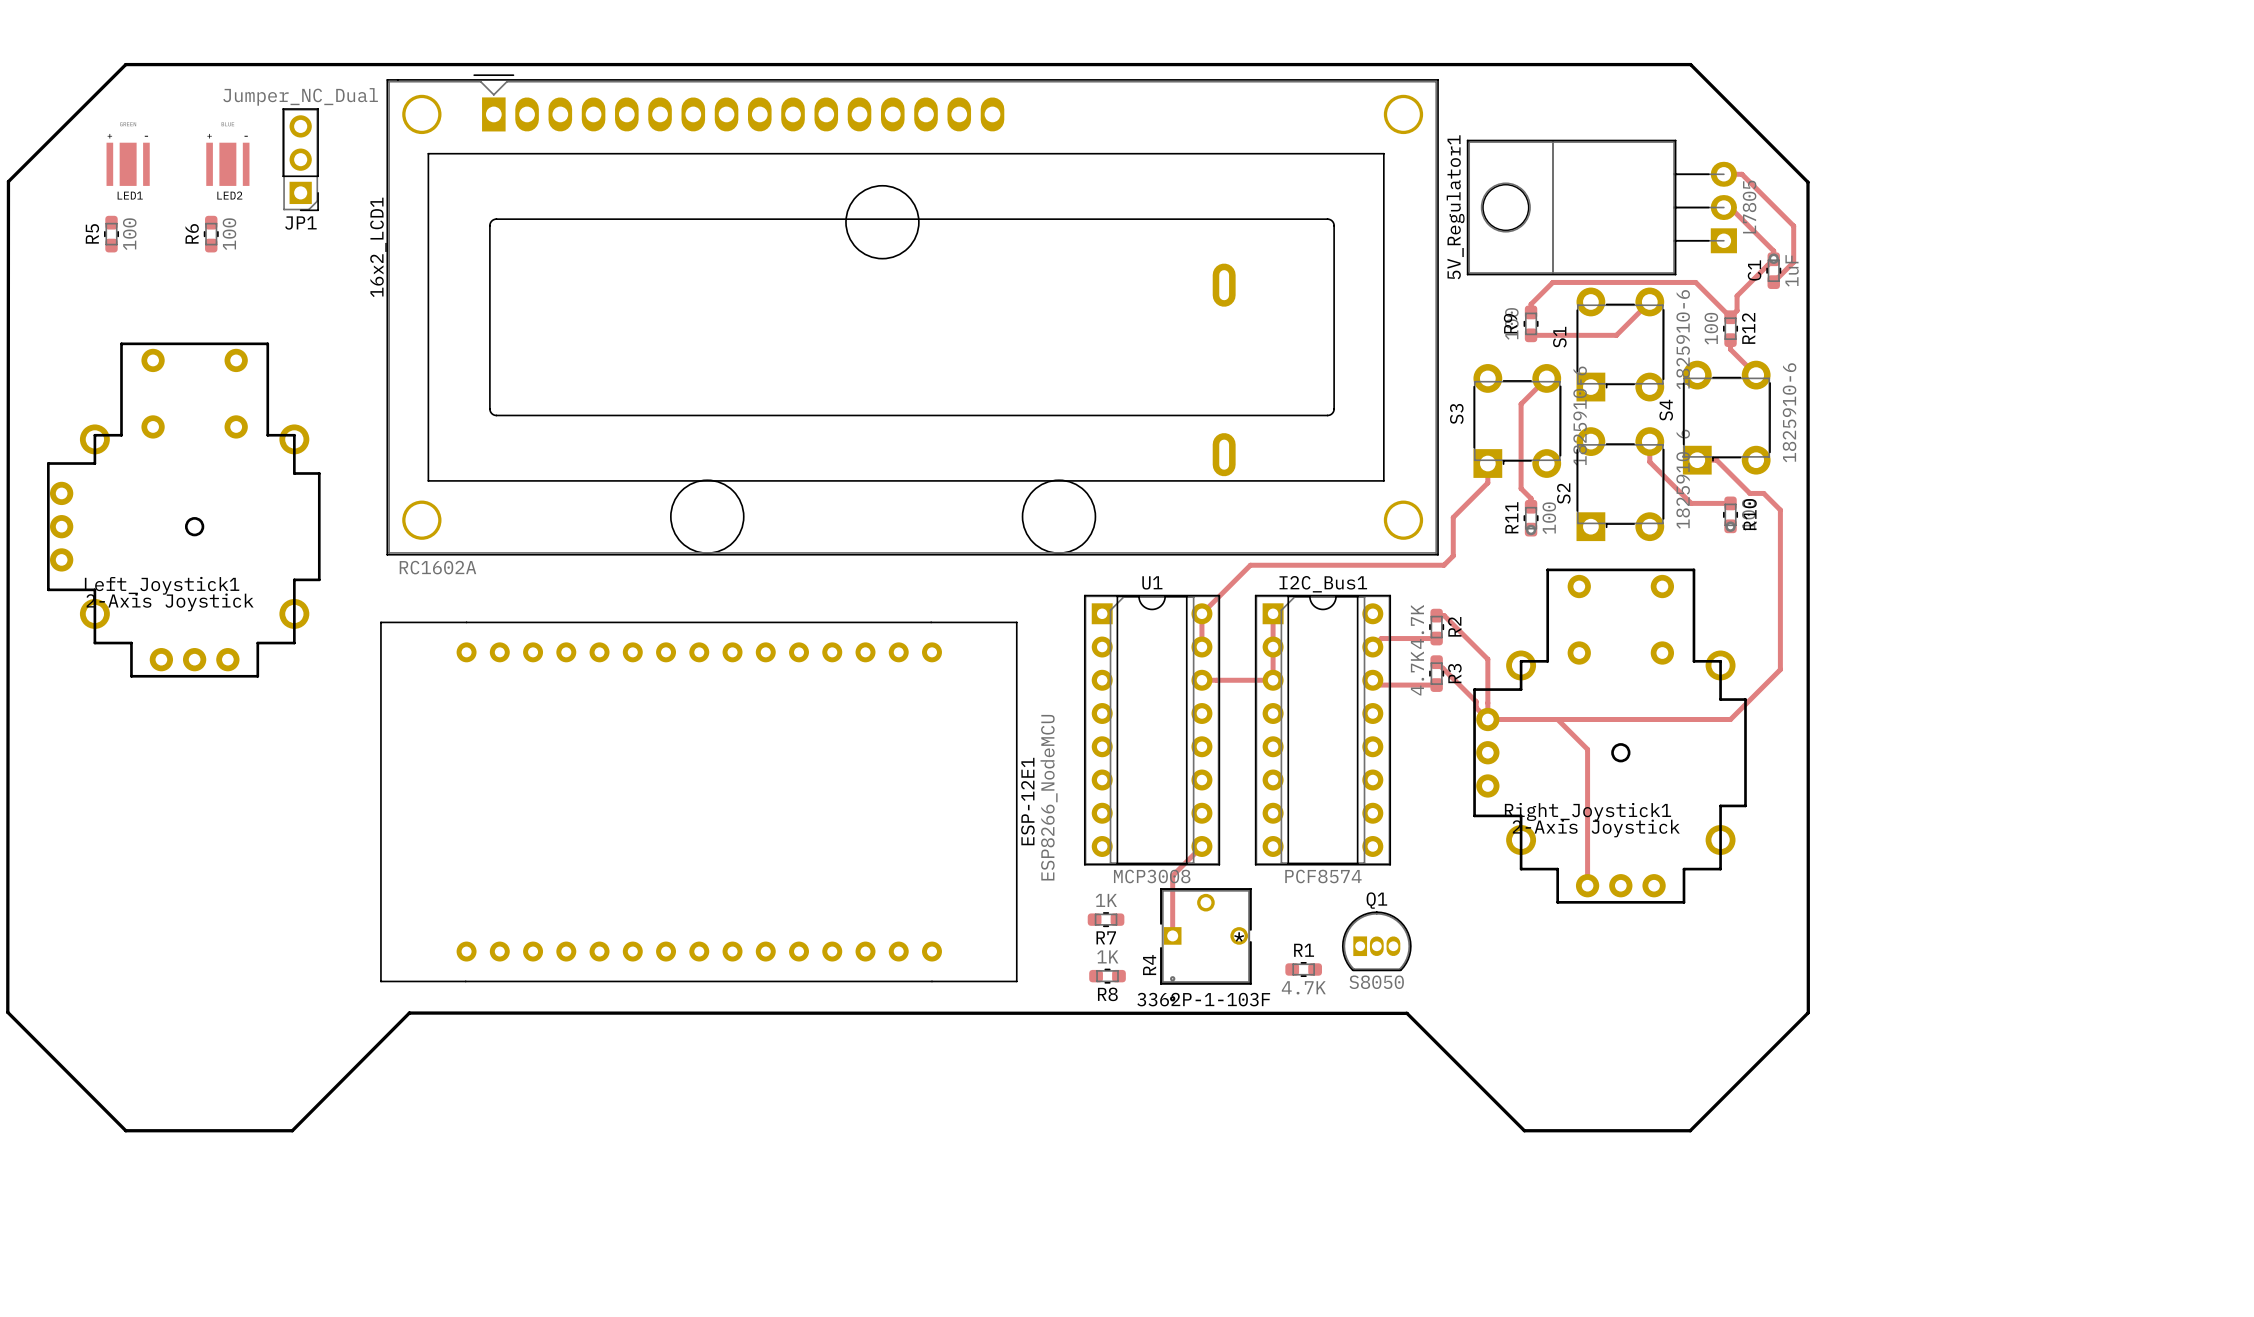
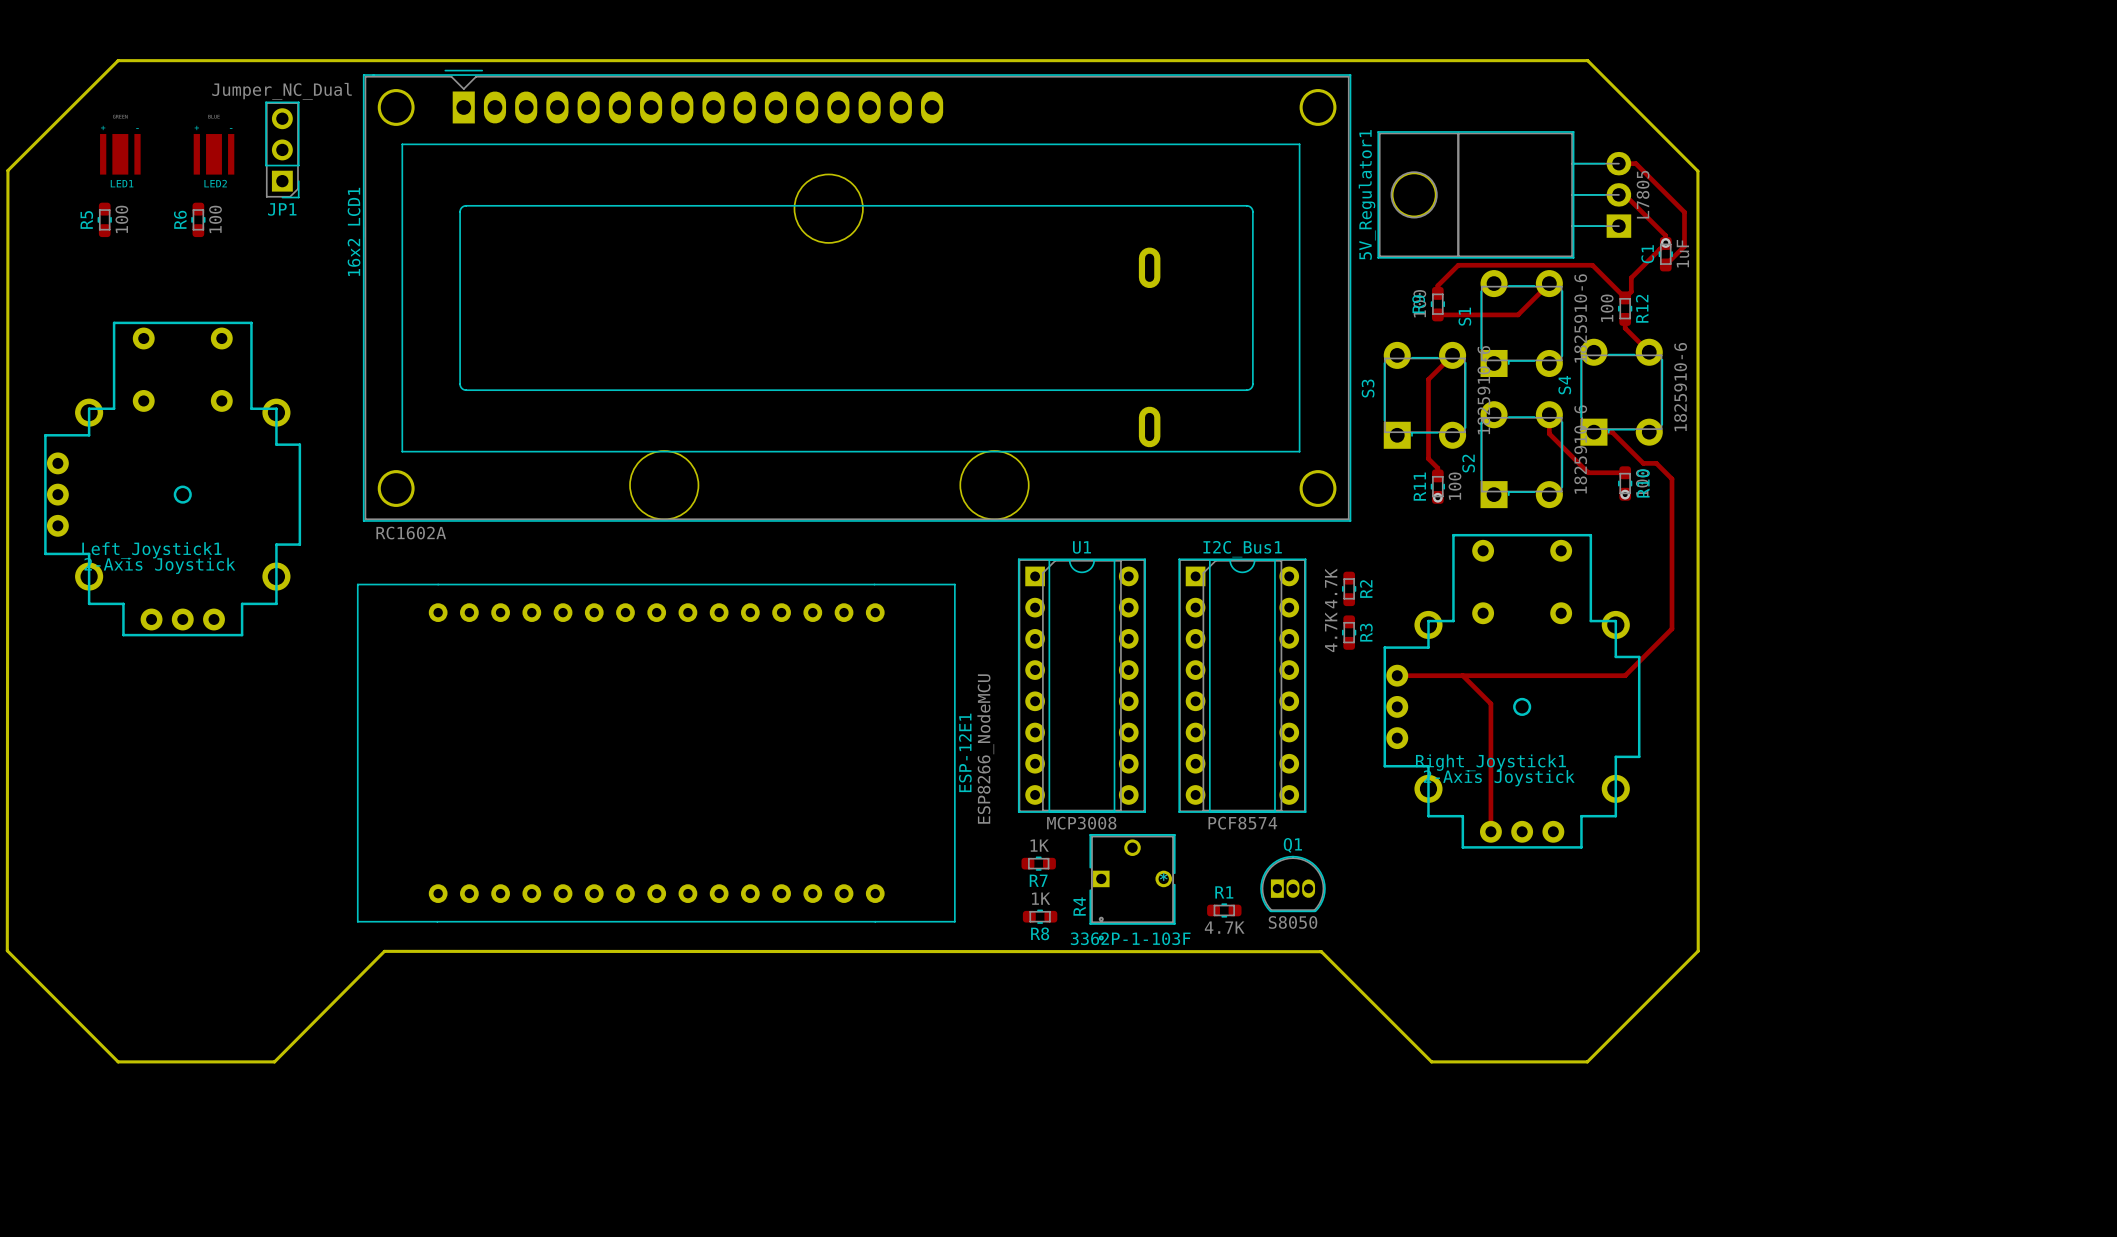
track: (1487, 463) (1487, 482) (1453, 517) (1453, 555) (1443, 565) (1250, 565) (1201, 613) (1201, 647) -> none
track: (1273, 613) (1273, 680) (1201, 680) -> none
track: (1436, 615) (1444, 615) (1487, 659) (1487, 719) (1476, 707) (1476, 701) (1436, 662) -> none
track: (1436, 638) (1381, 638) (1372, 647) -> none
track: (1372, 680) (1377, 685) (1436, 685) -> none
track: (1201, 846) (1172, 875) (1172, 935) -> none

